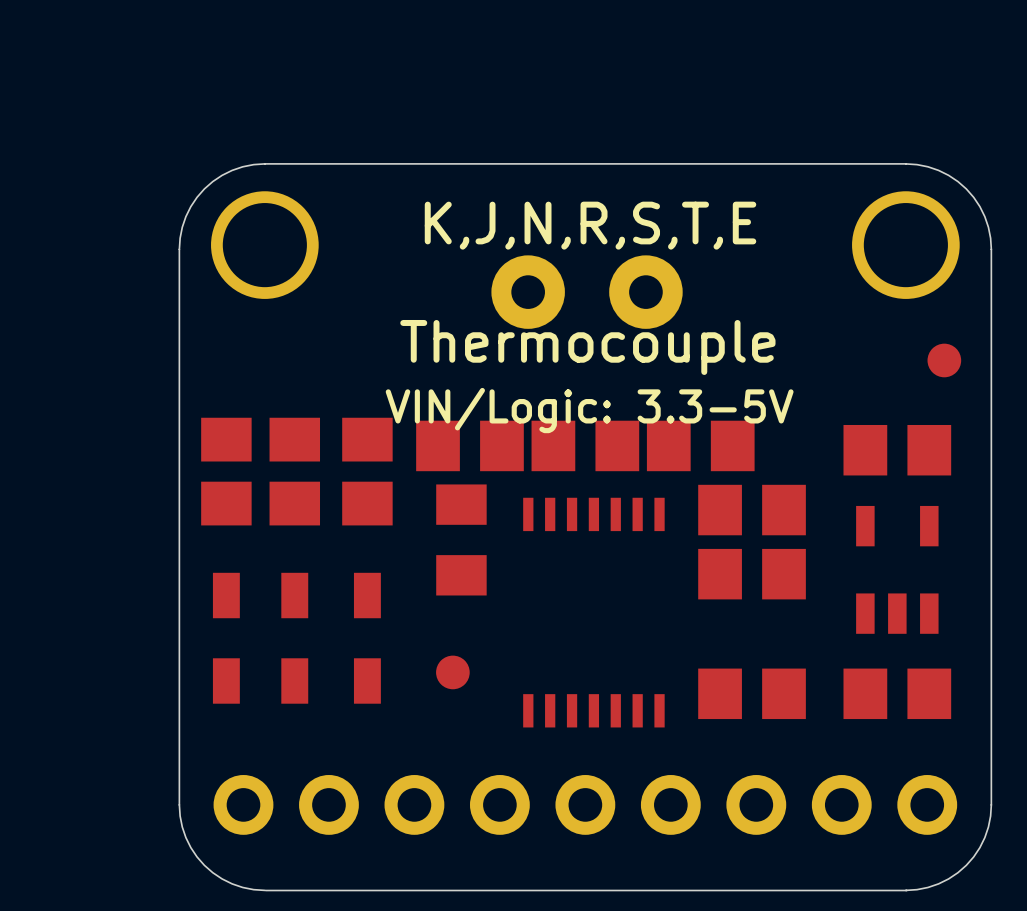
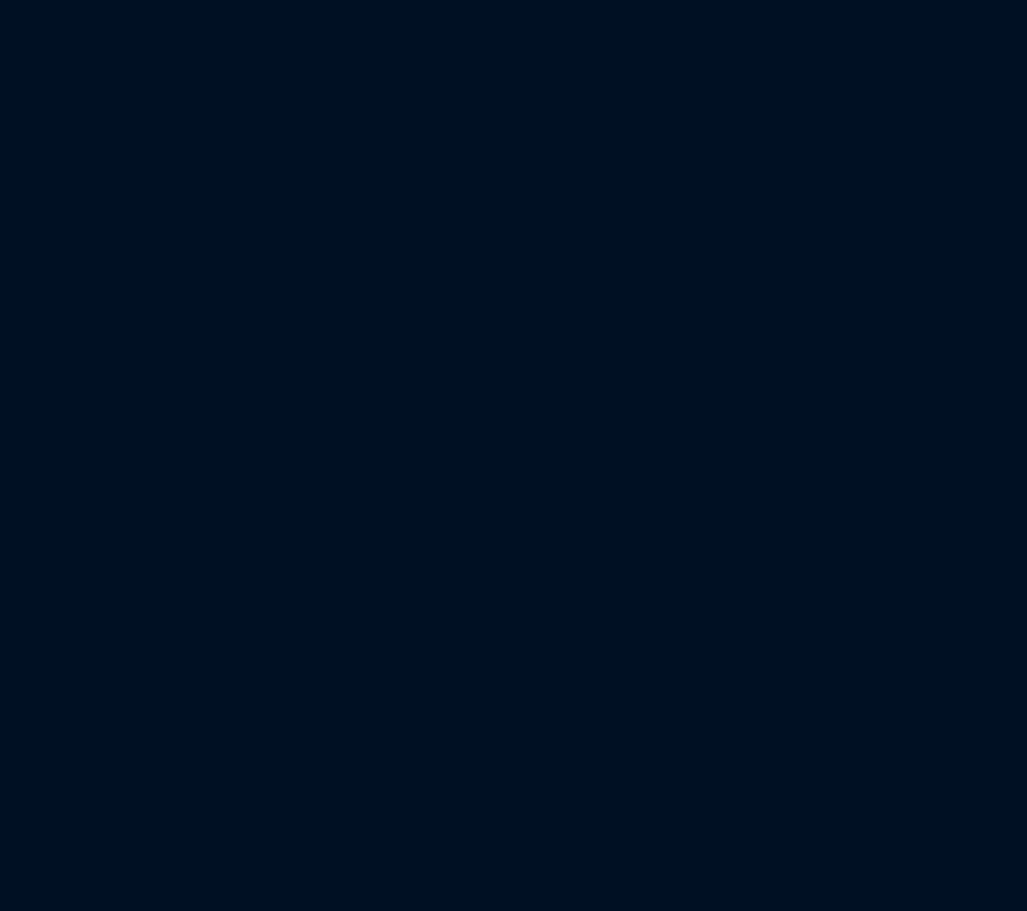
part: (585, 527) -> none

